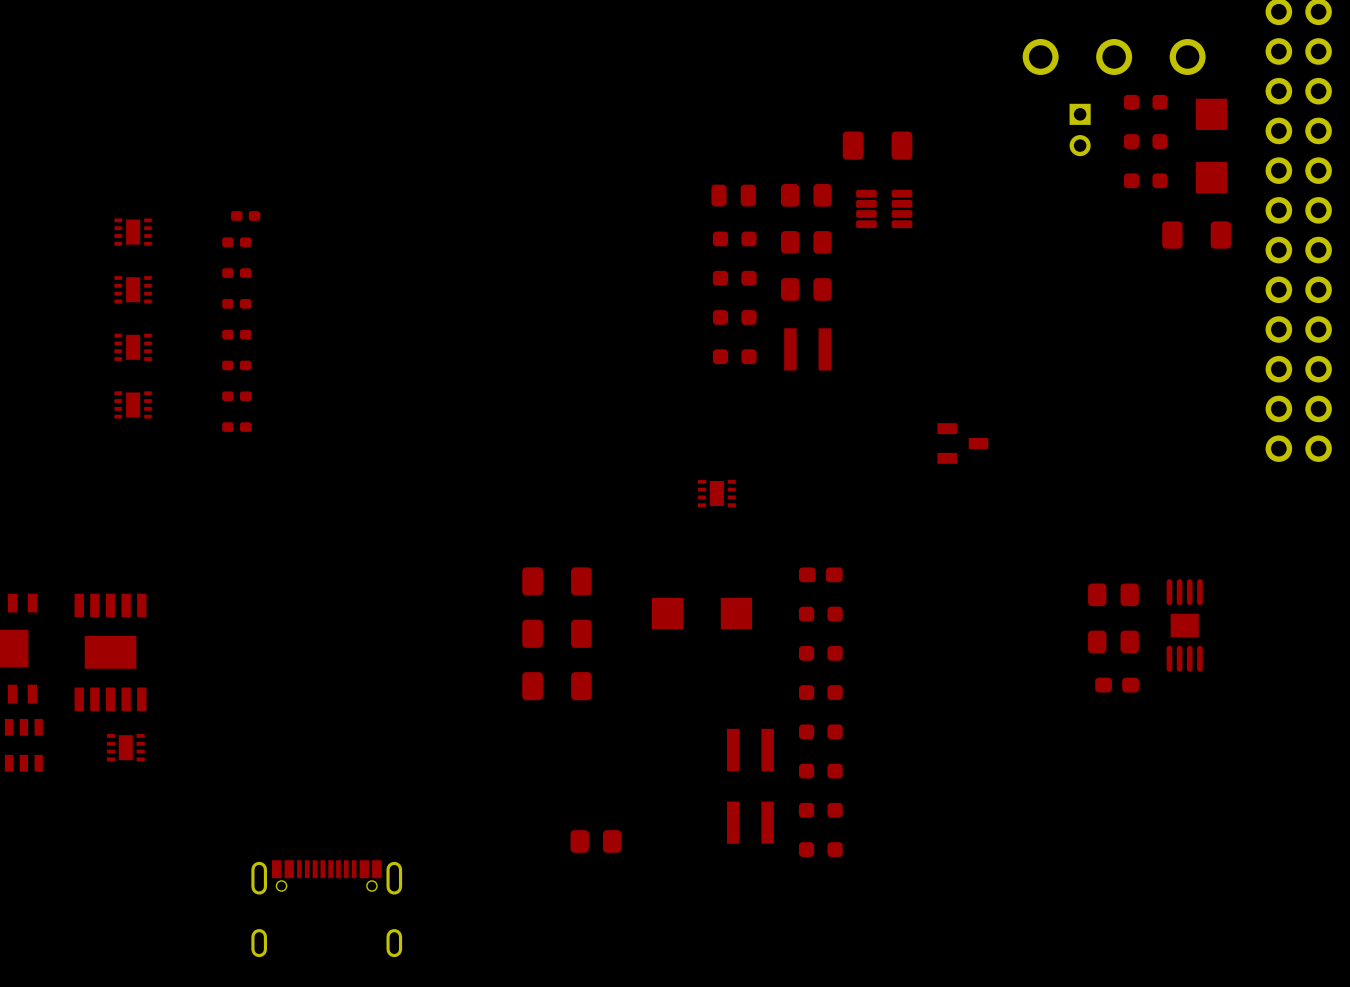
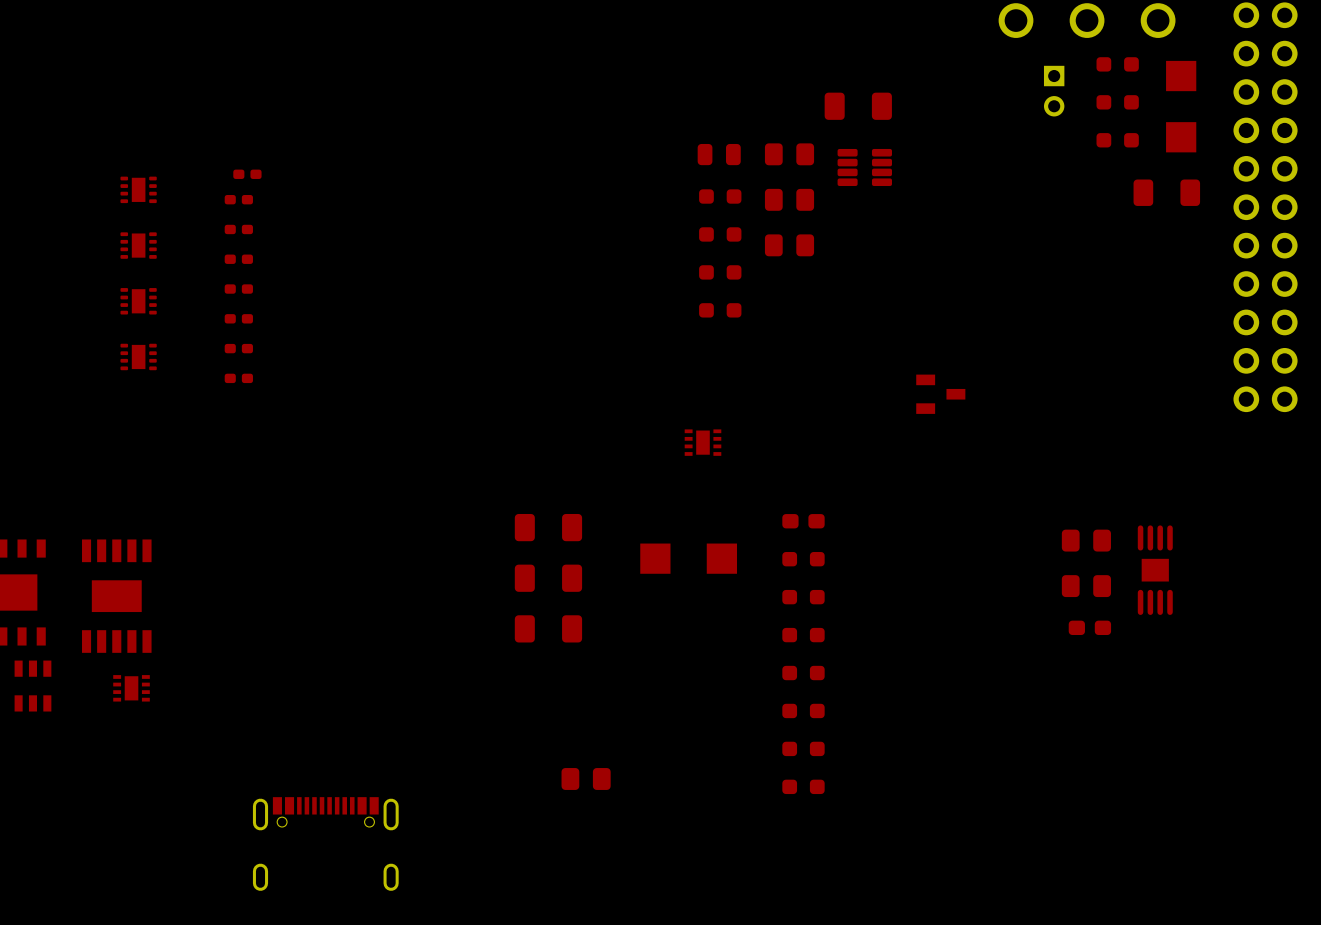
part: (807, 349) -> none
part: (750, 749) -> none
part: (750, 822) -> none

